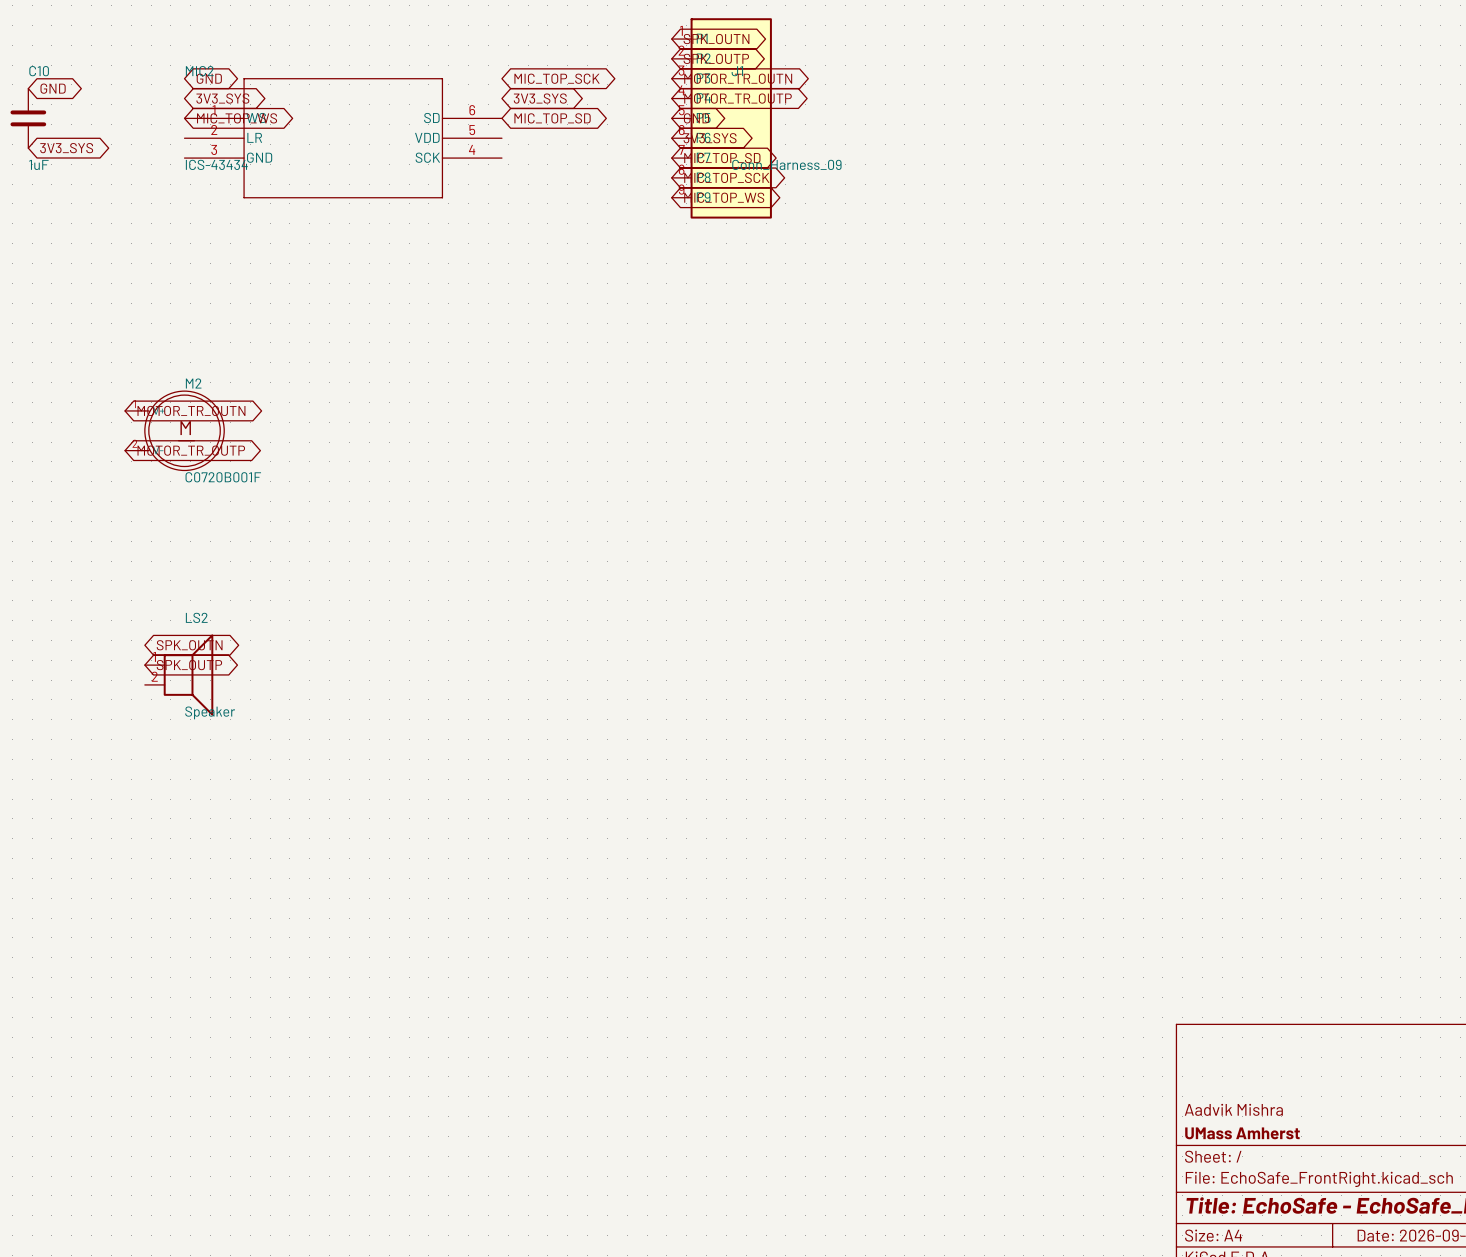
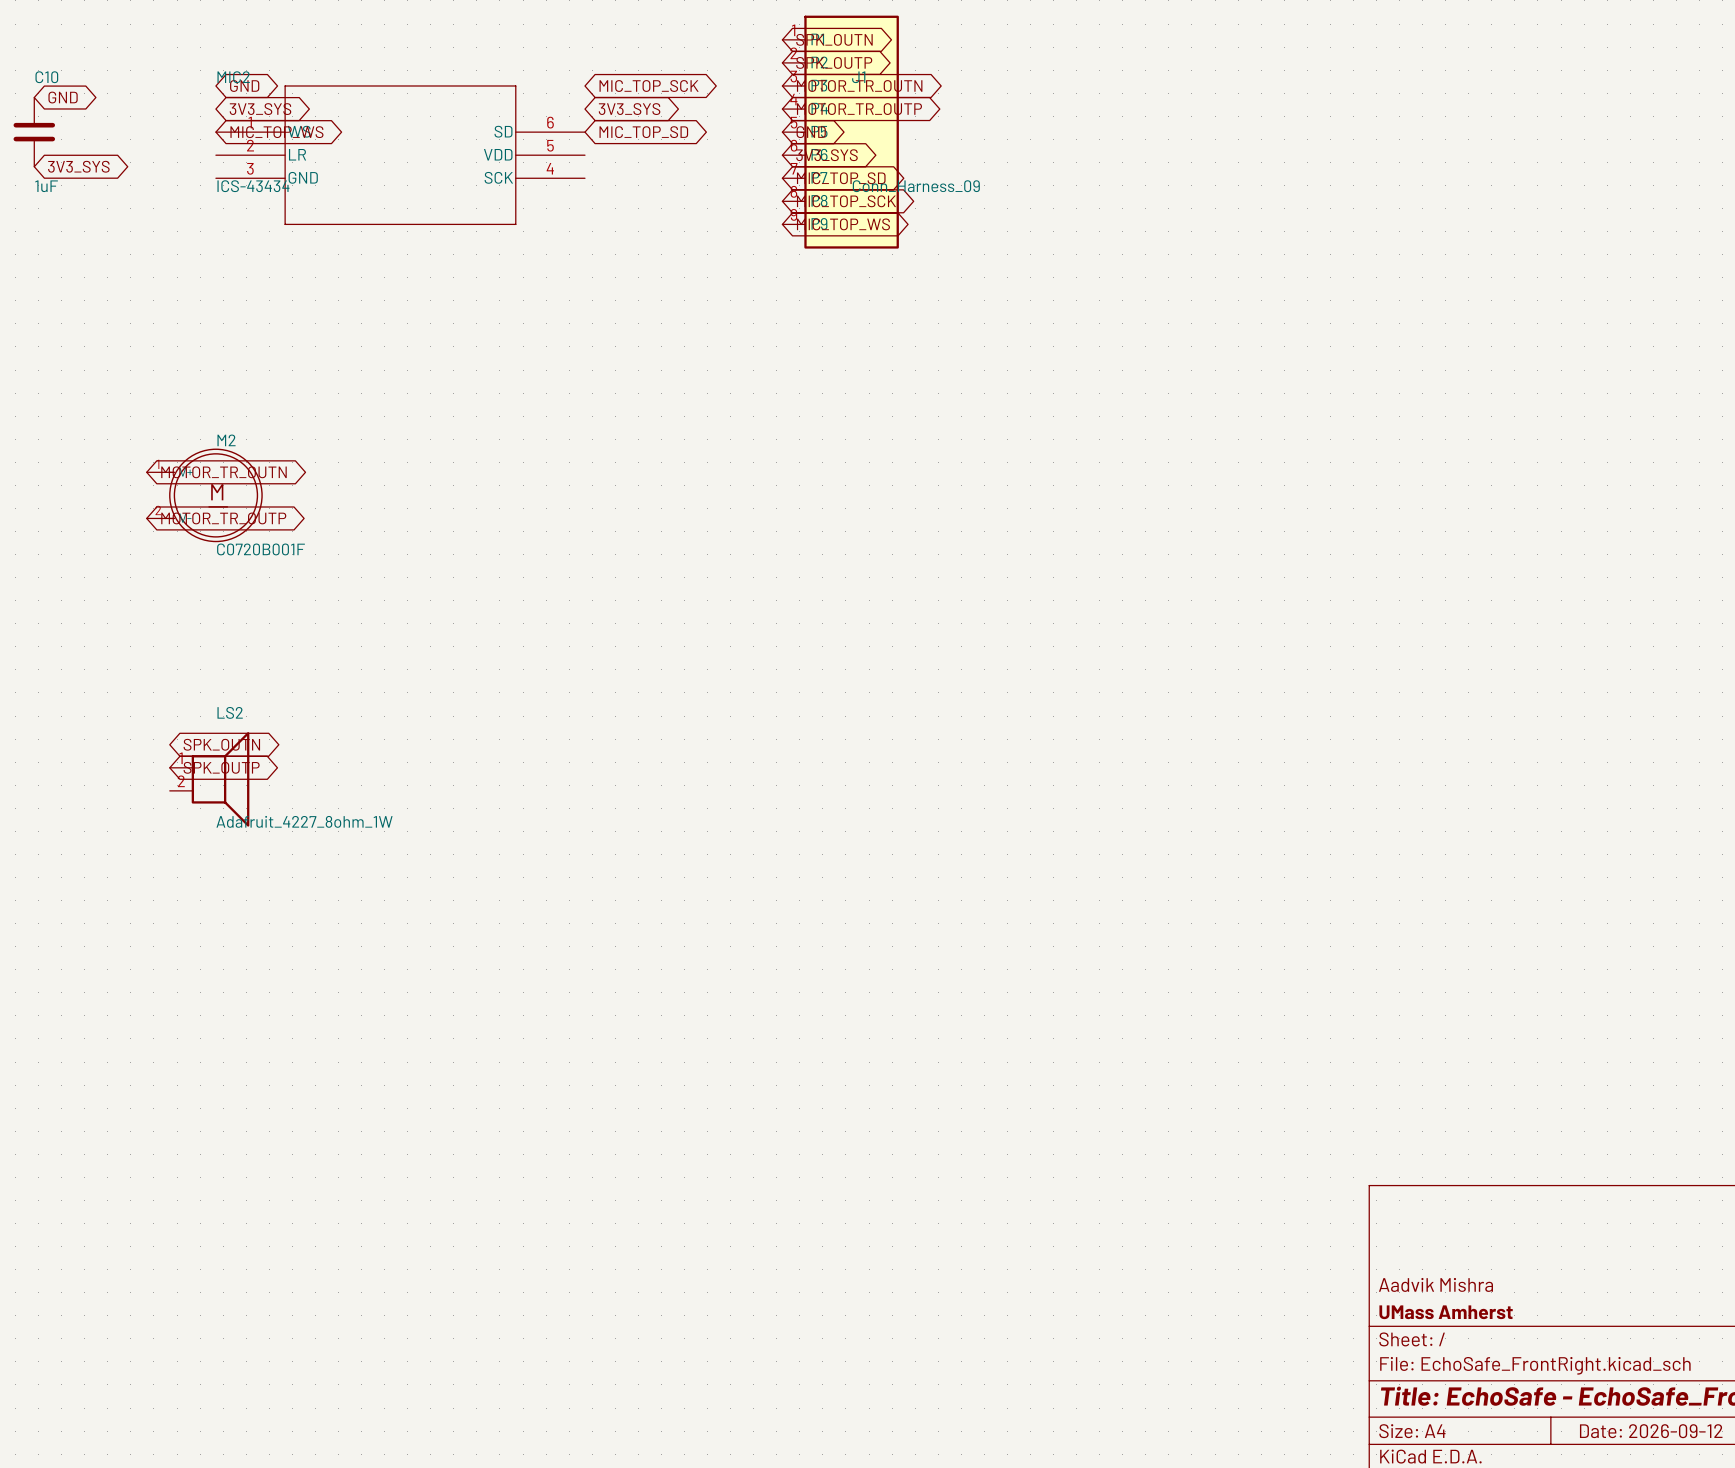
LS2 value: Speaker (210, 712) -> Adafruit_4227_8ohm_1W (304, 821)

